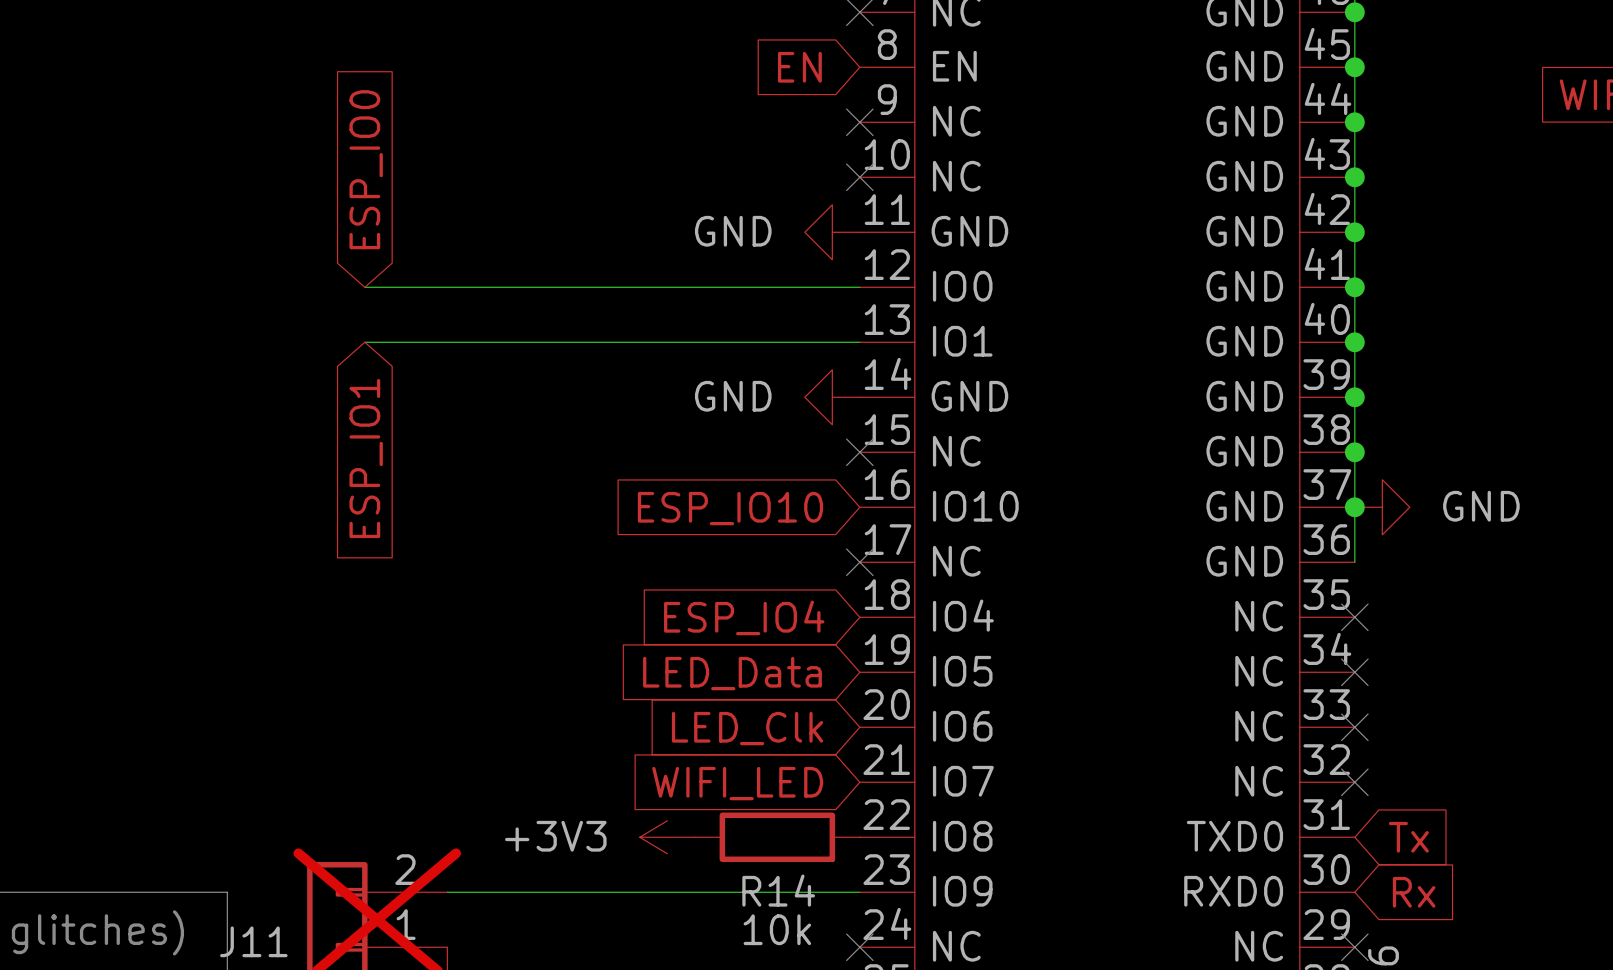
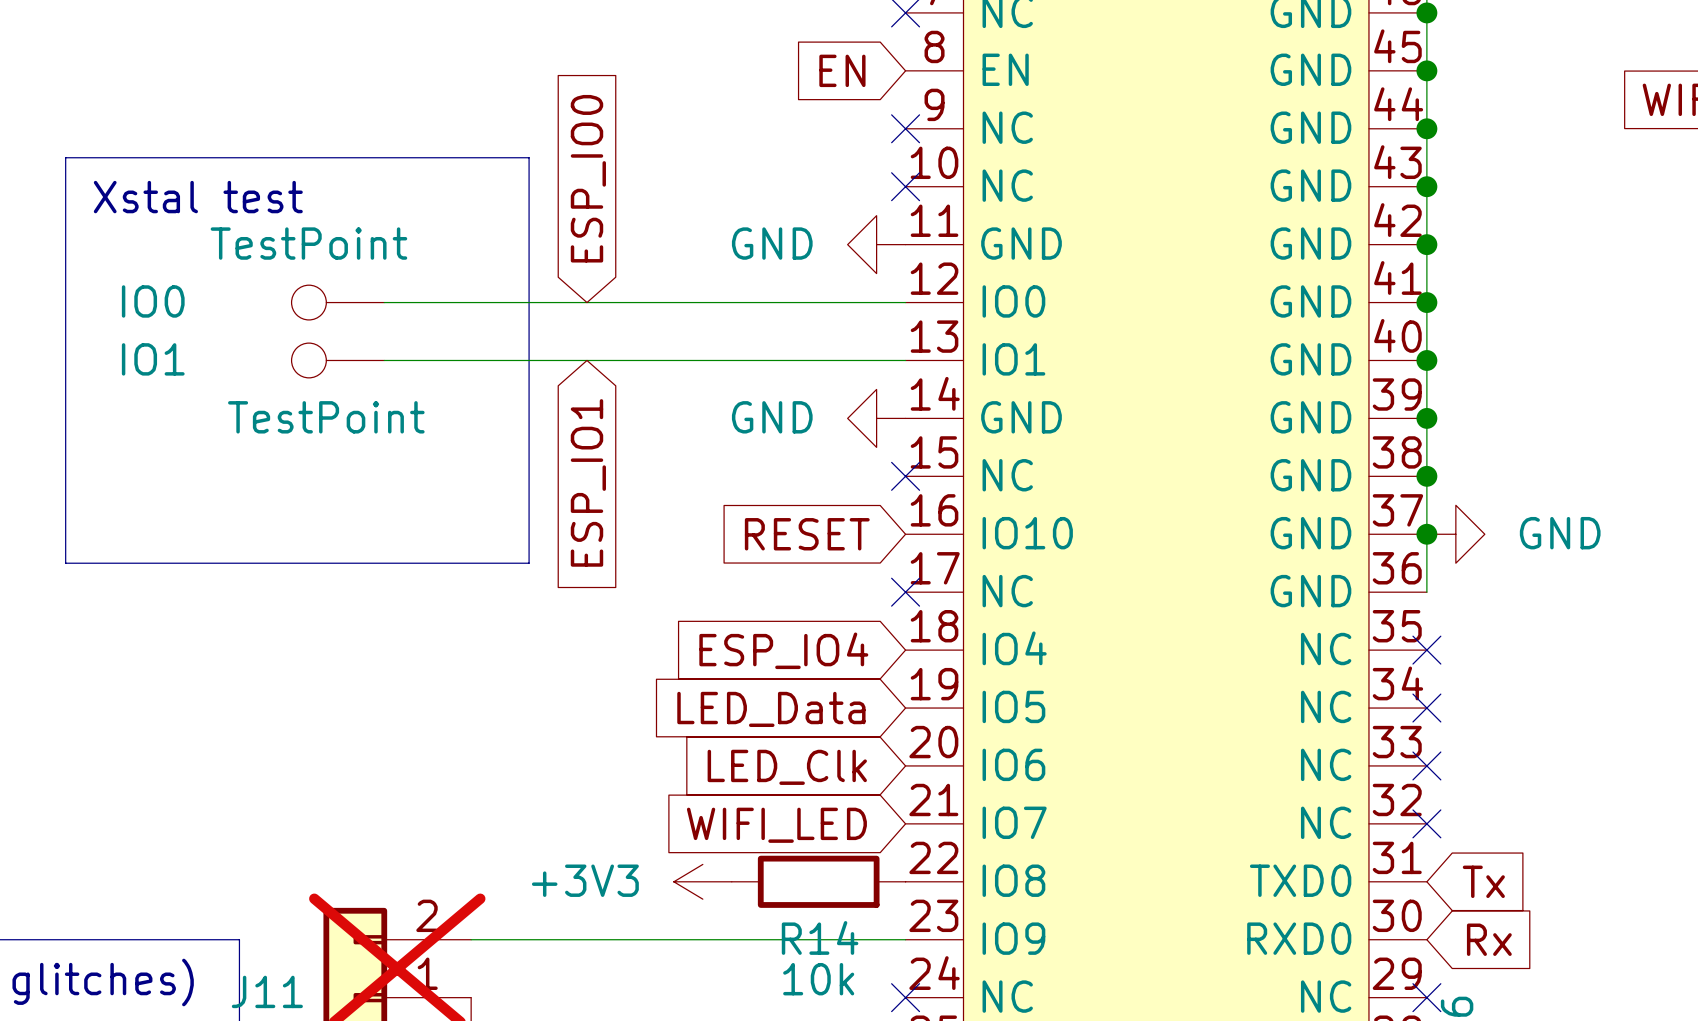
line: none -> (65, 157) (529, 157) (529, 563) (65, 563) (65, 157)
global label position: ESP_IO0 (366, 169) -> ESP_IO0 (588, 178)
text: none -> Xstal test (198, 197)
IO0: none -> TestPoint (337, 302)
IO1: none -> TestPoint (337, 360)
global label position: ESP_IO1 (366, 458) -> ESP_IO1 (588, 482)
global label: ESP_IO10 (730, 508) -> RESET (807, 534)

